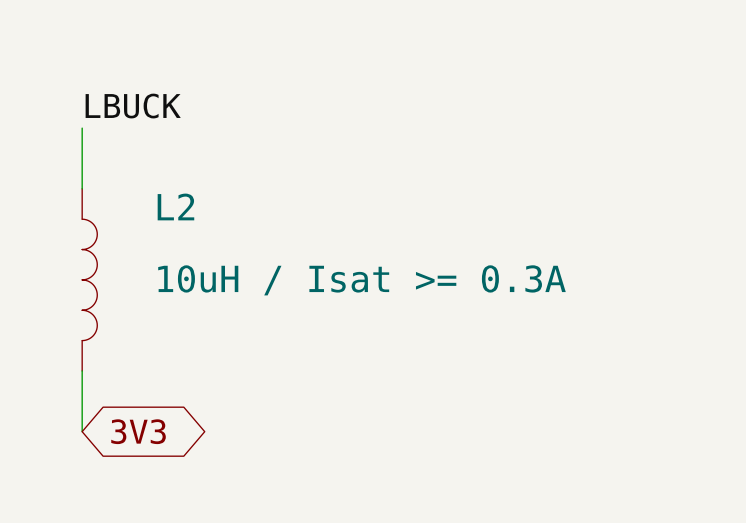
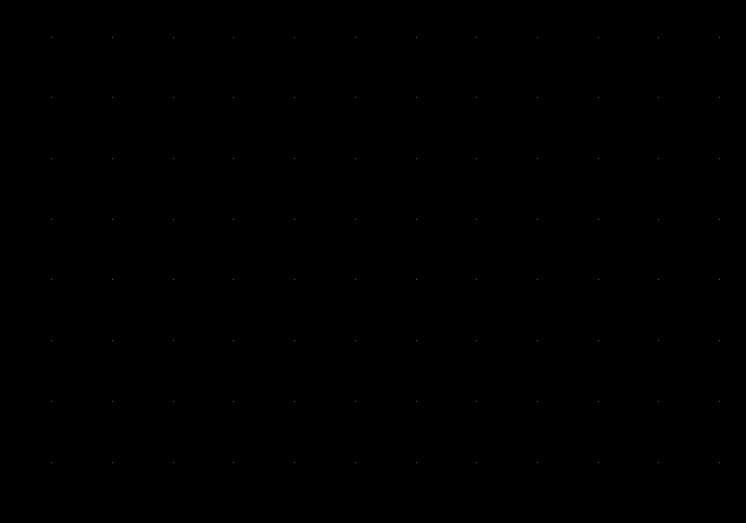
label: LBUCK (133, 106) -> none
wire: (82, 128) (82, 188) -> none
L2: 10uH / Isat >= 0.3A (89, 279) -> none
wire: (82, 370) (82, 431) -> none
global label: 3V3 (138, 431) -> none

